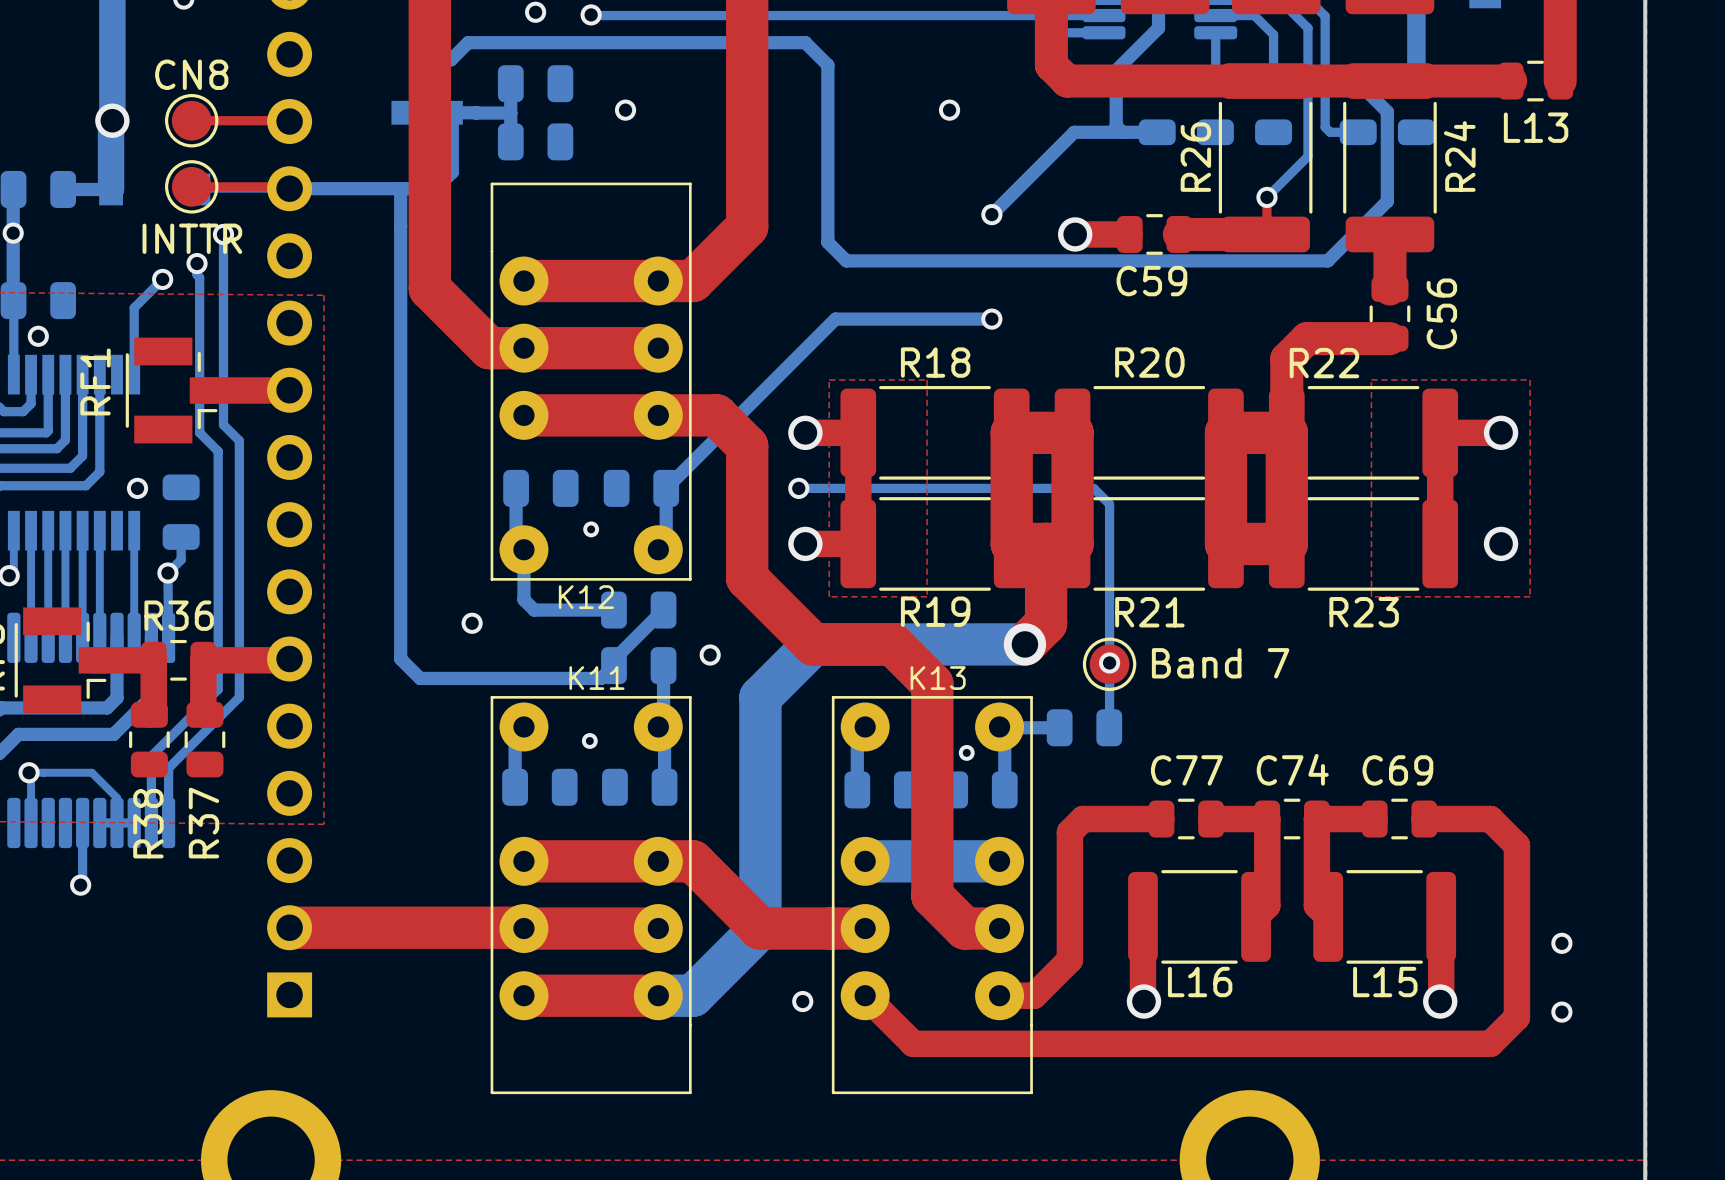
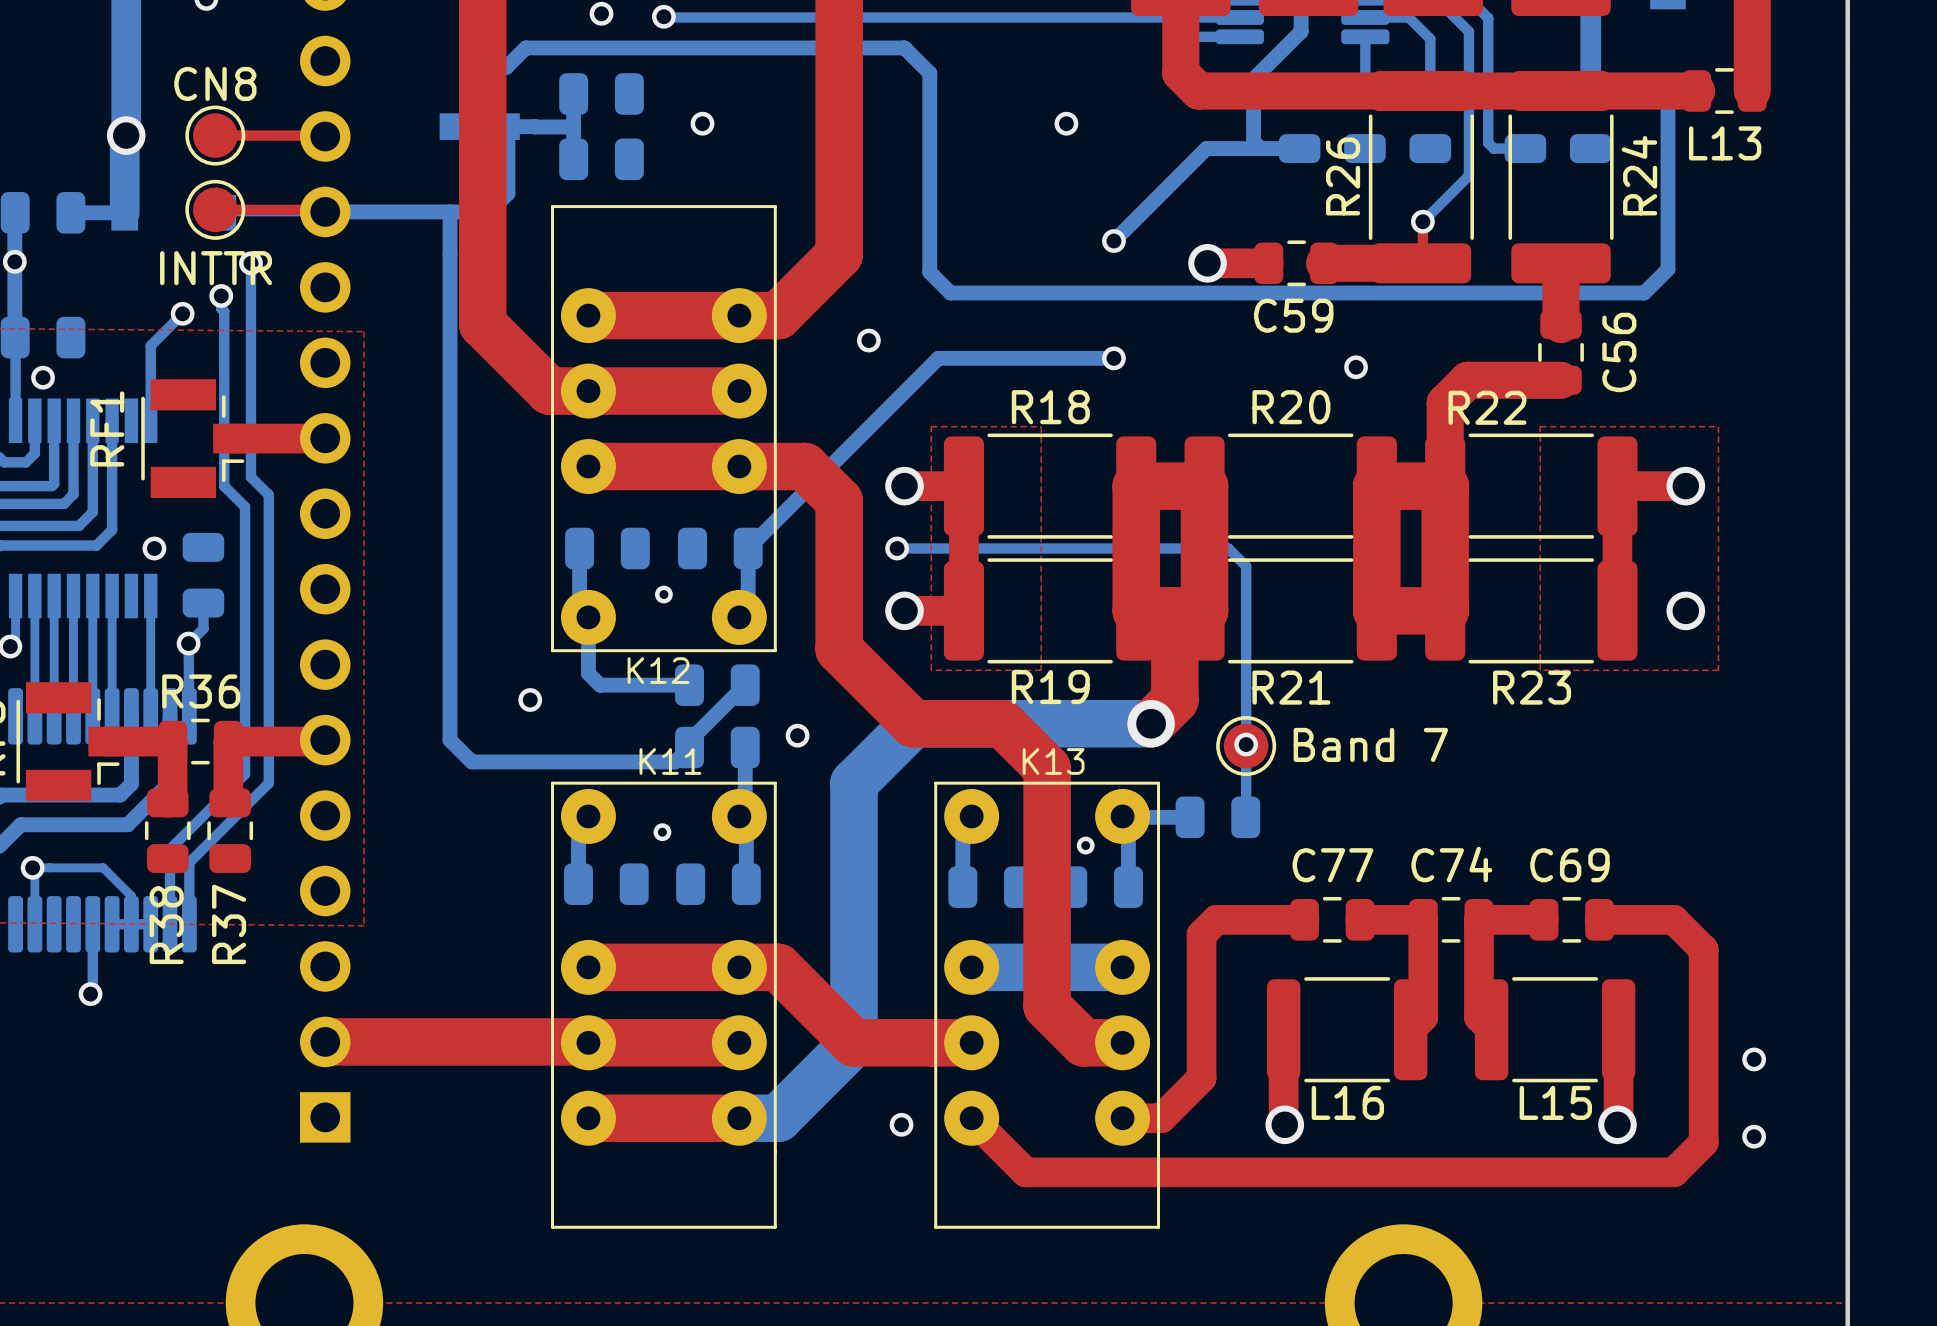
bottom track: (1358, 82) (1387, 111) (1387, 201) (1327, 260) -> (1667, 93) (1667, 269) (1644, 293) (1491, 293)
via: none -> (868, 340)
via: none -> (1356, 367)

